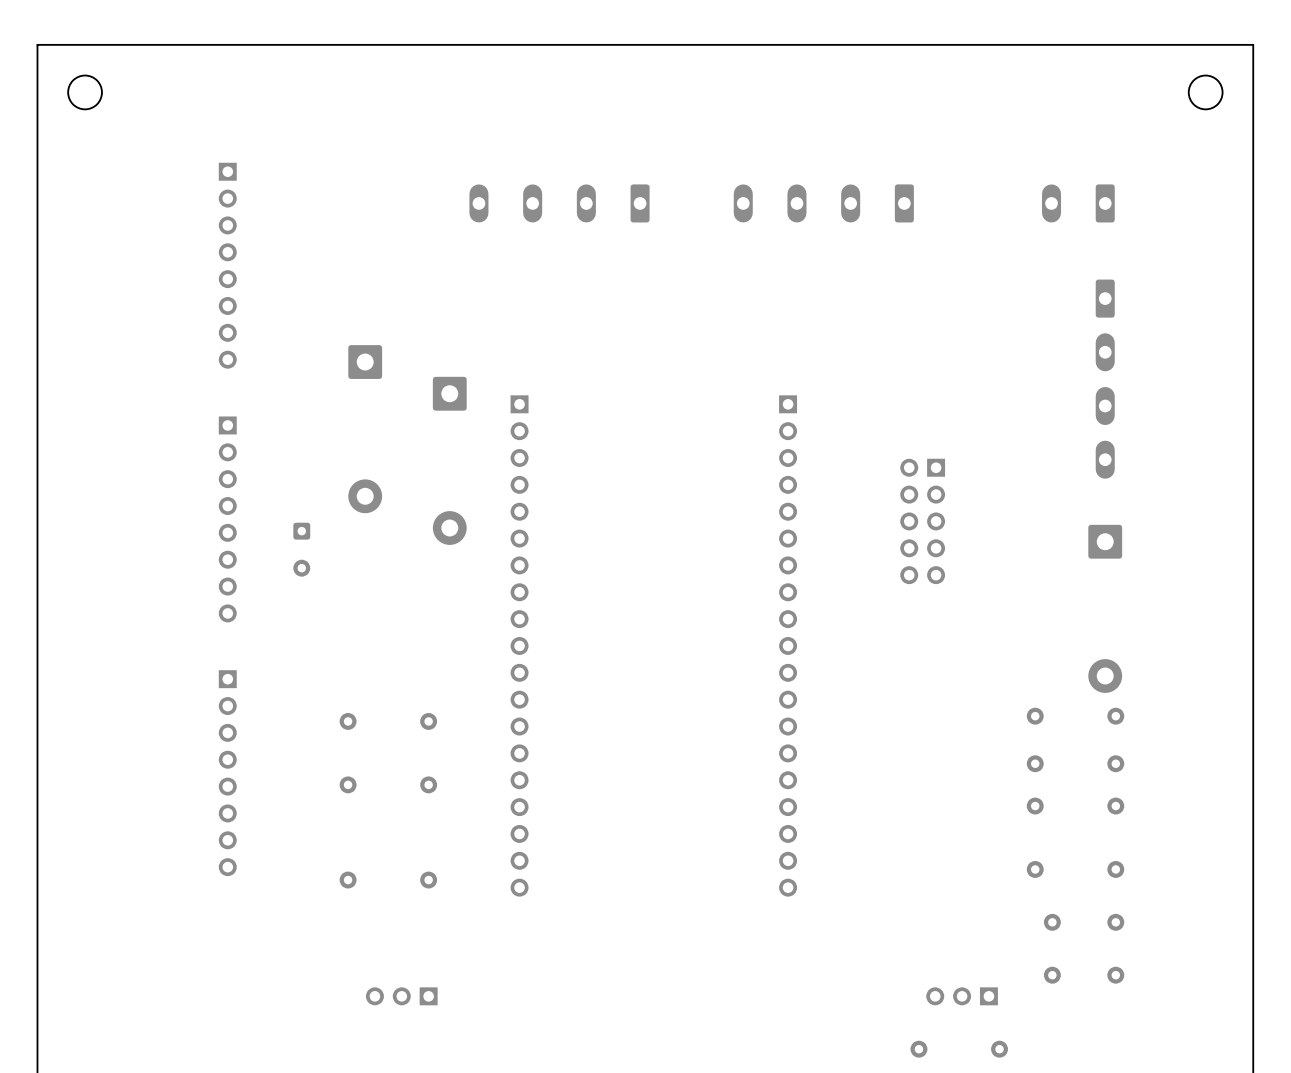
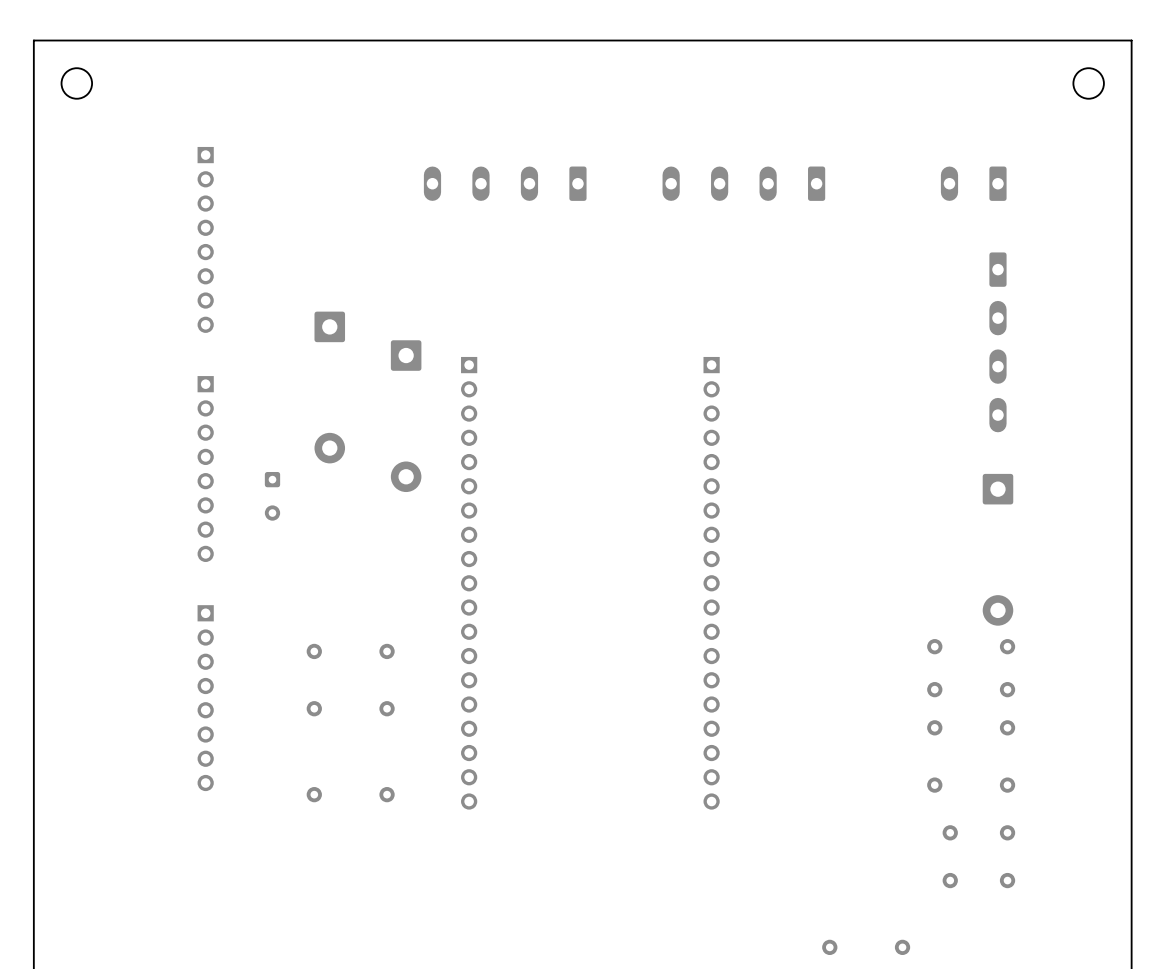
part: (922, 521) -> none
part: (401, 996) -> none
part: (962, 996) -> none

